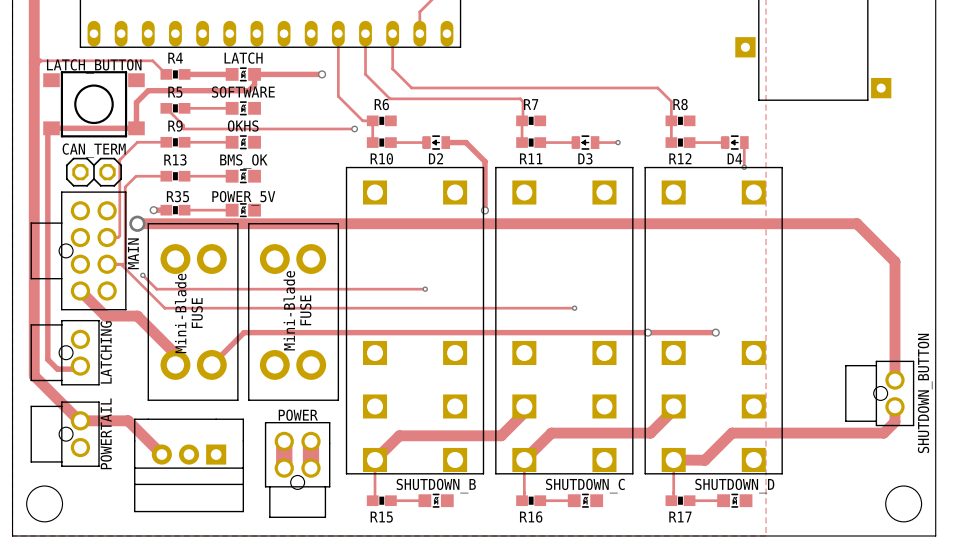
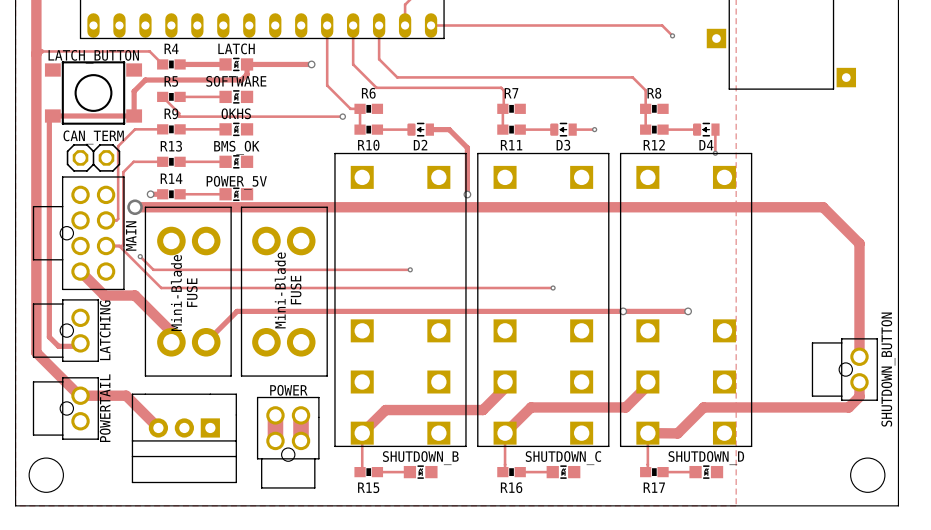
track: none -> (431, 25) (662, 25) (672, 35)
via: none -> (672, 35)
R35 name: R35 (177, 196) -> R14 (171, 178)

